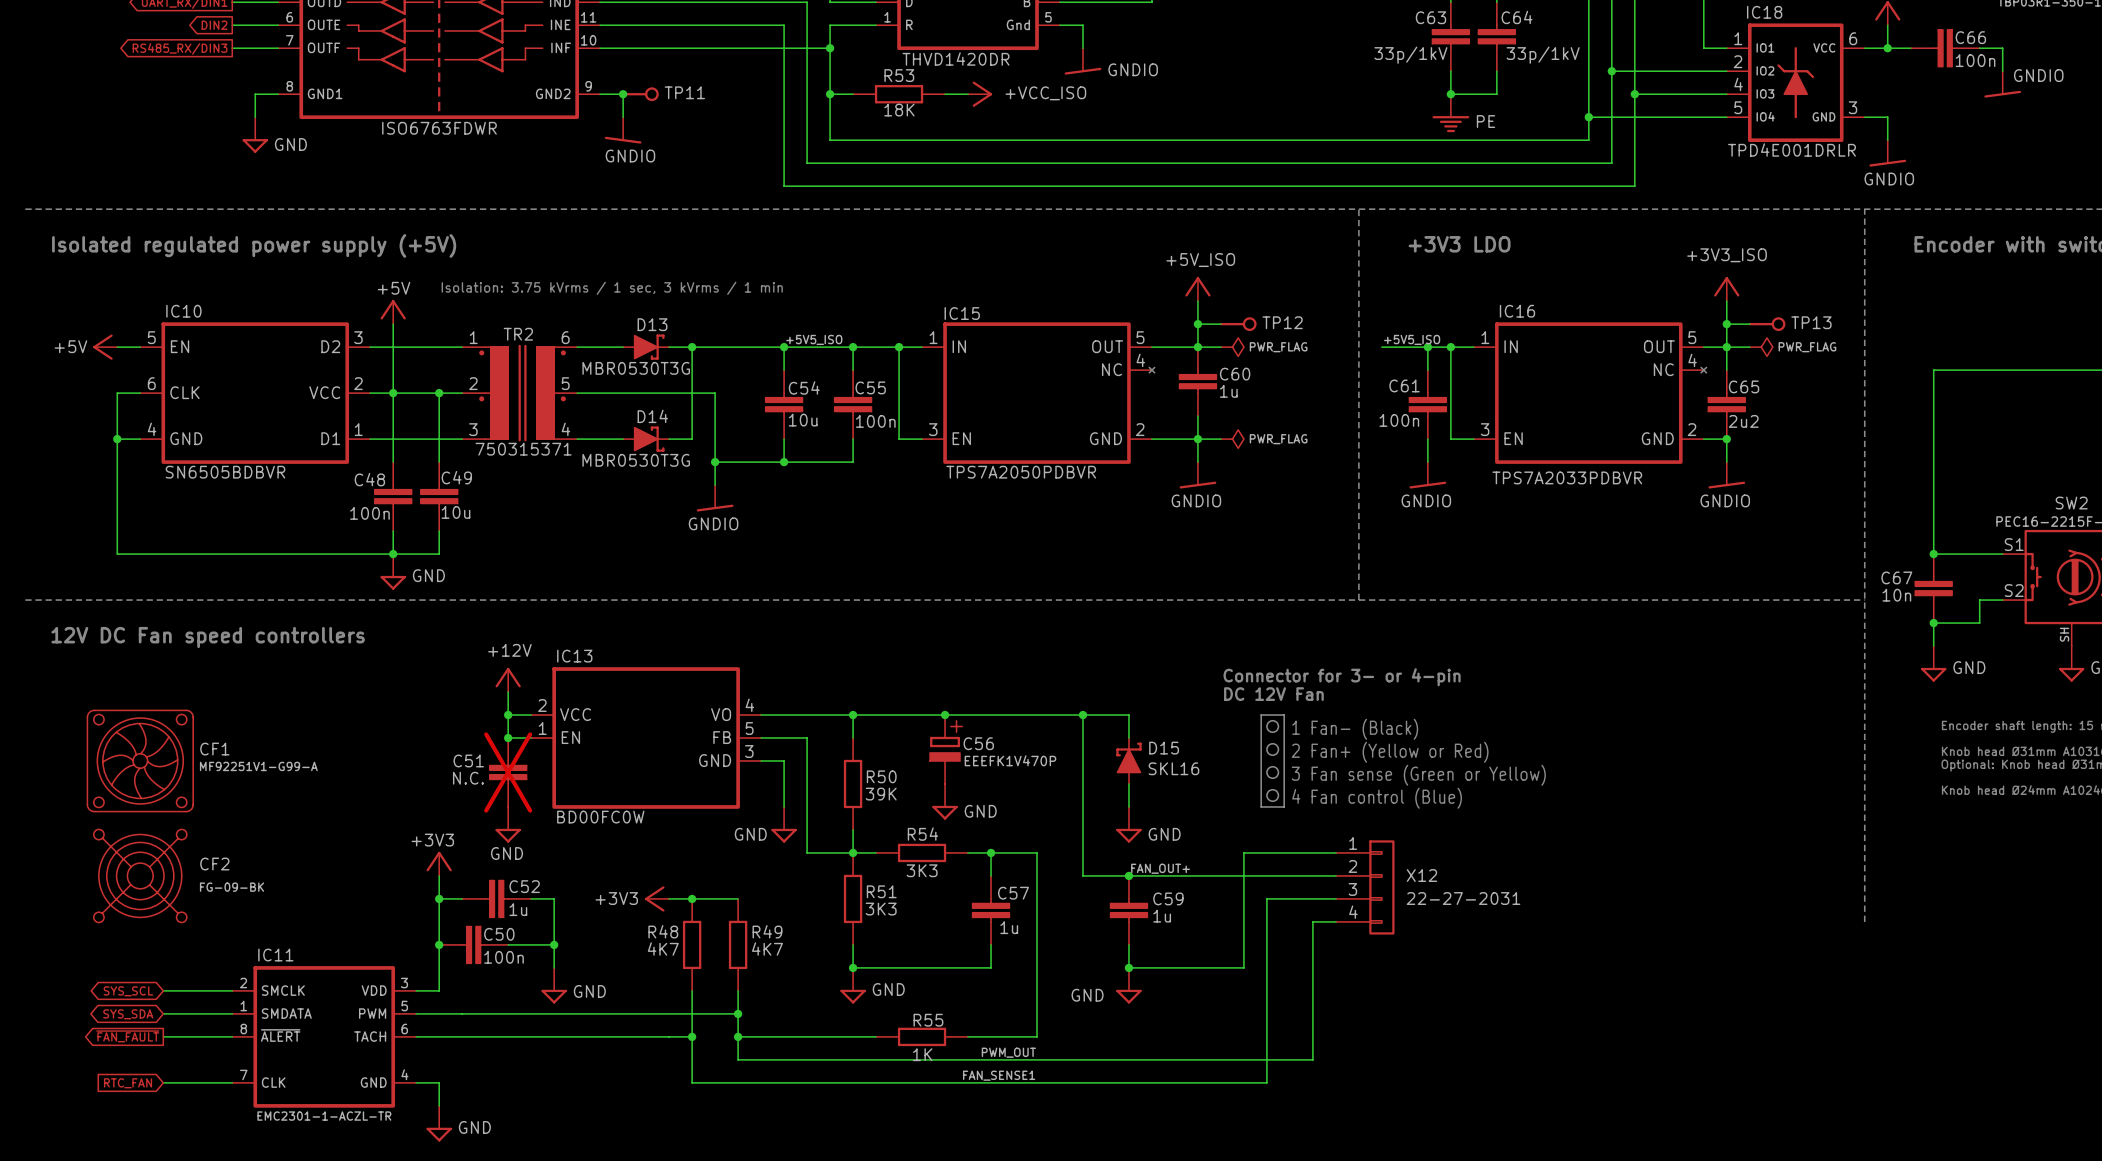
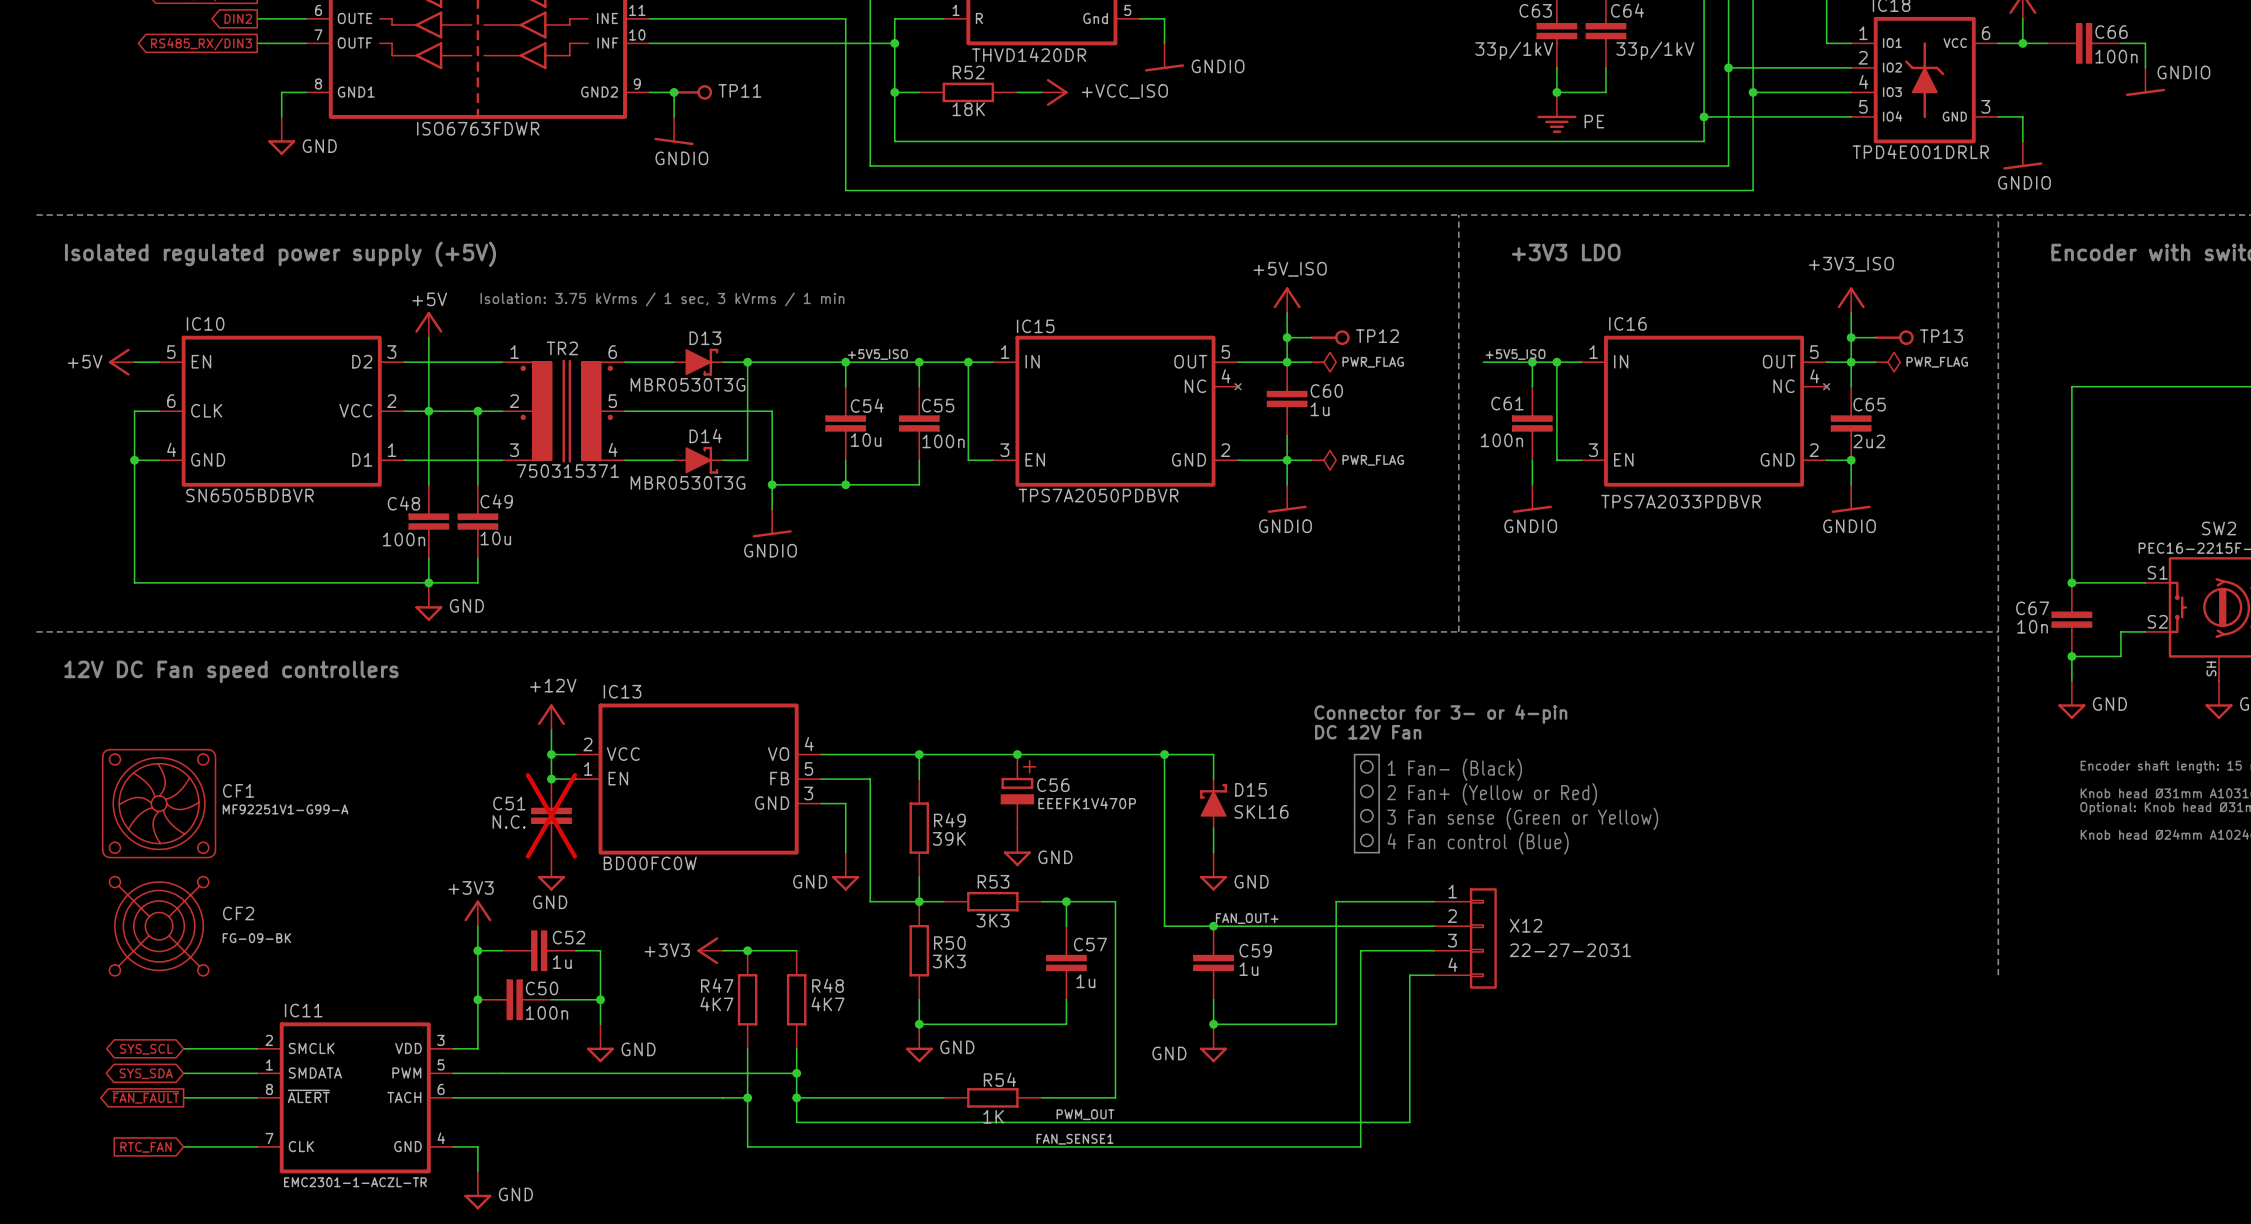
R53 name: R53 (899, 75) -> R52 (968, 72)
R50 name: R50 (881, 776) -> R49 (949, 820)
R54 name: R54 (922, 834) -> R53 (993, 881)
R51 name: R51 (881, 891) -> R50 (949, 943)
R48 name: R48 (663, 931) -> R47 (717, 985)
R49 name: R49 (767, 931) -> R48 (828, 985)
R55 name: R55 (928, 1020) -> R54 (999, 1079)

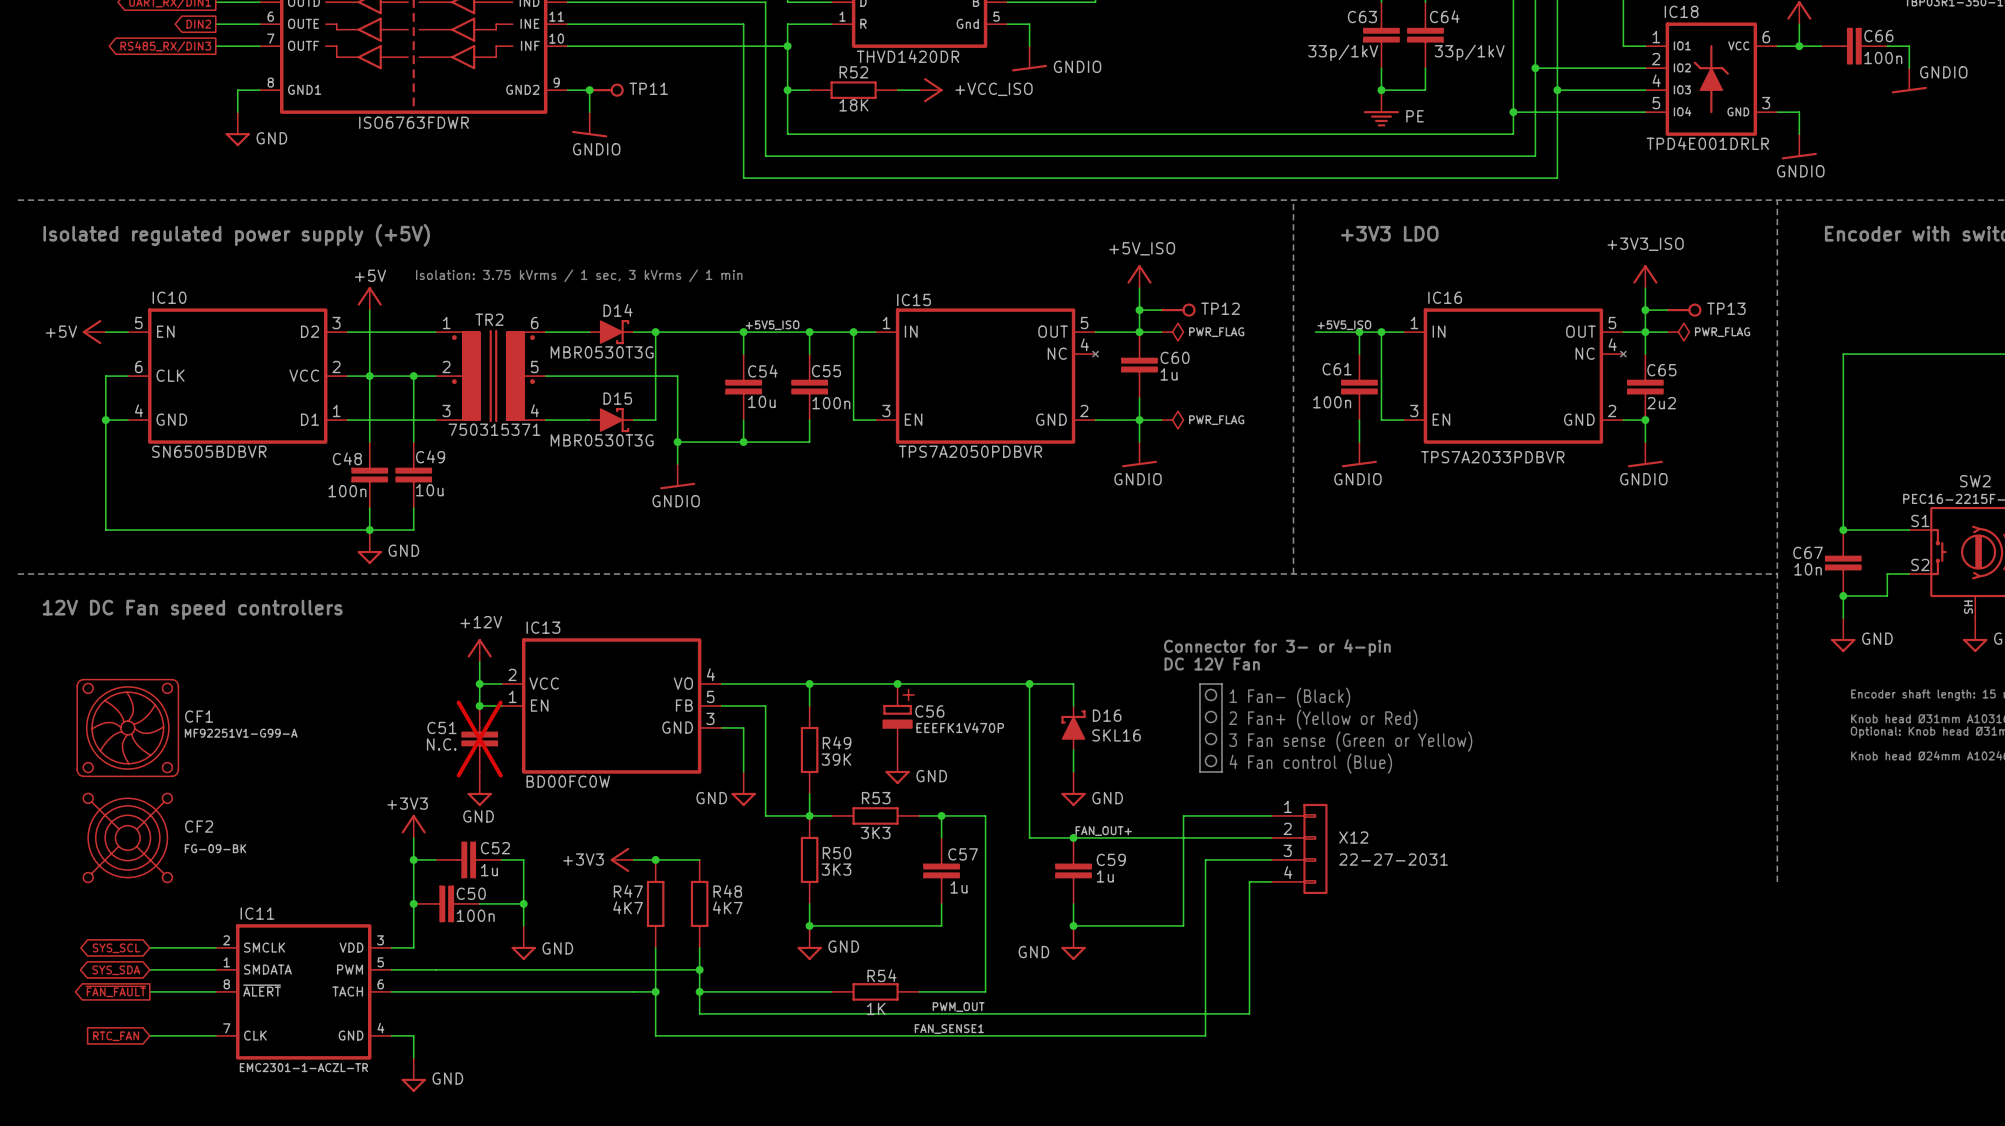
D13 name: D13 (705, 338) -> D14 (618, 310)
D14 name: D14 (705, 436) -> D15 (617, 398)
D15 name: D15 (1251, 789) -> D16 (1107, 715)

